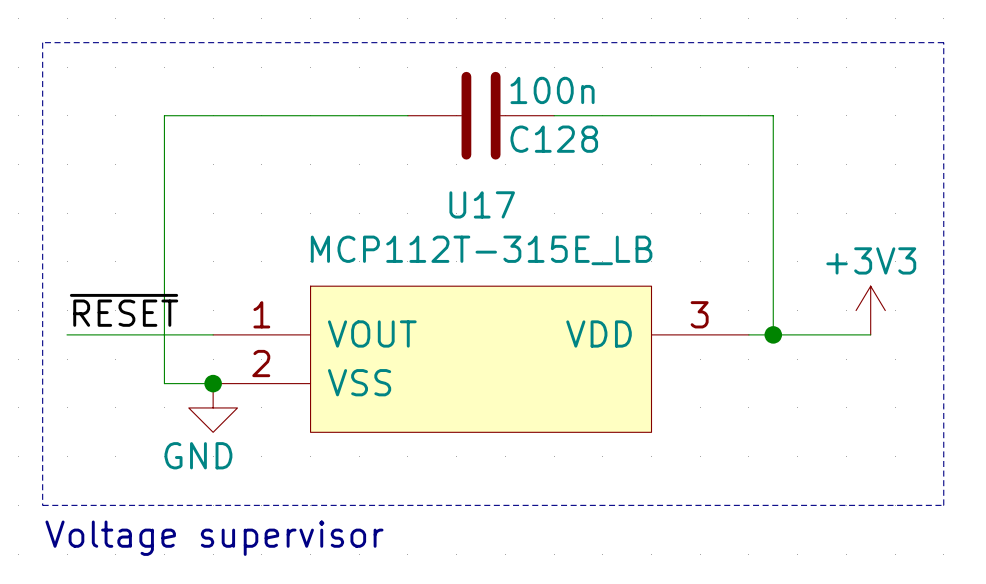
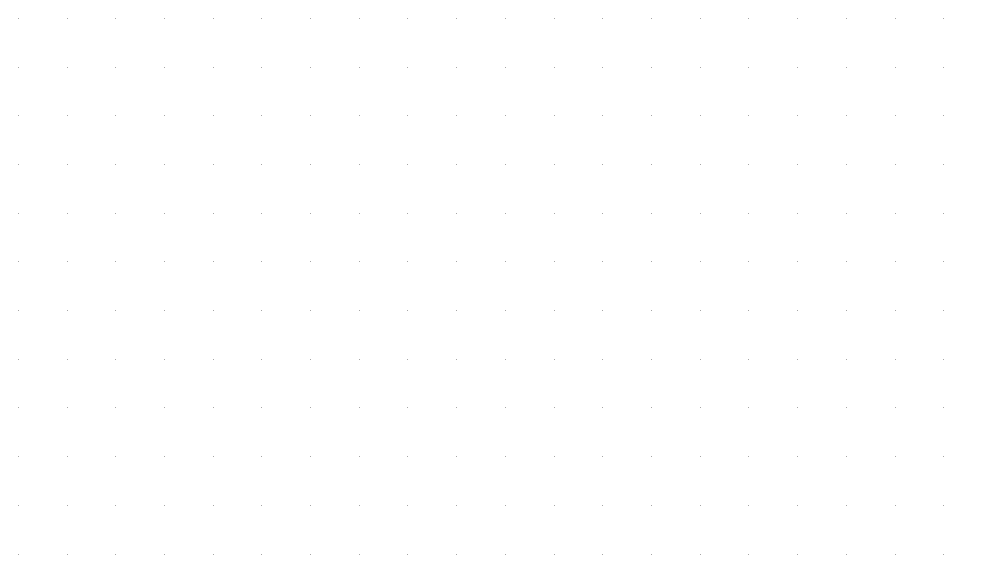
line: (42, 42) (943, 42) (943, 505) (42, 505) (42, 42) -> none
wire: (407, 115) (164, 115) (164, 383) (213, 383) -> none
C128: 100n (481, 115) -> none
wire: (554, 115) (773, 115) (773, 334) -> none
label: ~{RESET} (124, 310) -> none
power symbol: +3V3 (870, 310) -> none
wire: (67, 334) (213, 334) -> none
wire: (748, 334) (870, 334) -> none
junction: (773, 334) -> none
U17: MCP112T-315E_LB (481, 359) -> none
junction: (213, 383) -> none
power symbol: GND (213, 407) -> none
text: Voltage supervisor (214, 538) -> none

